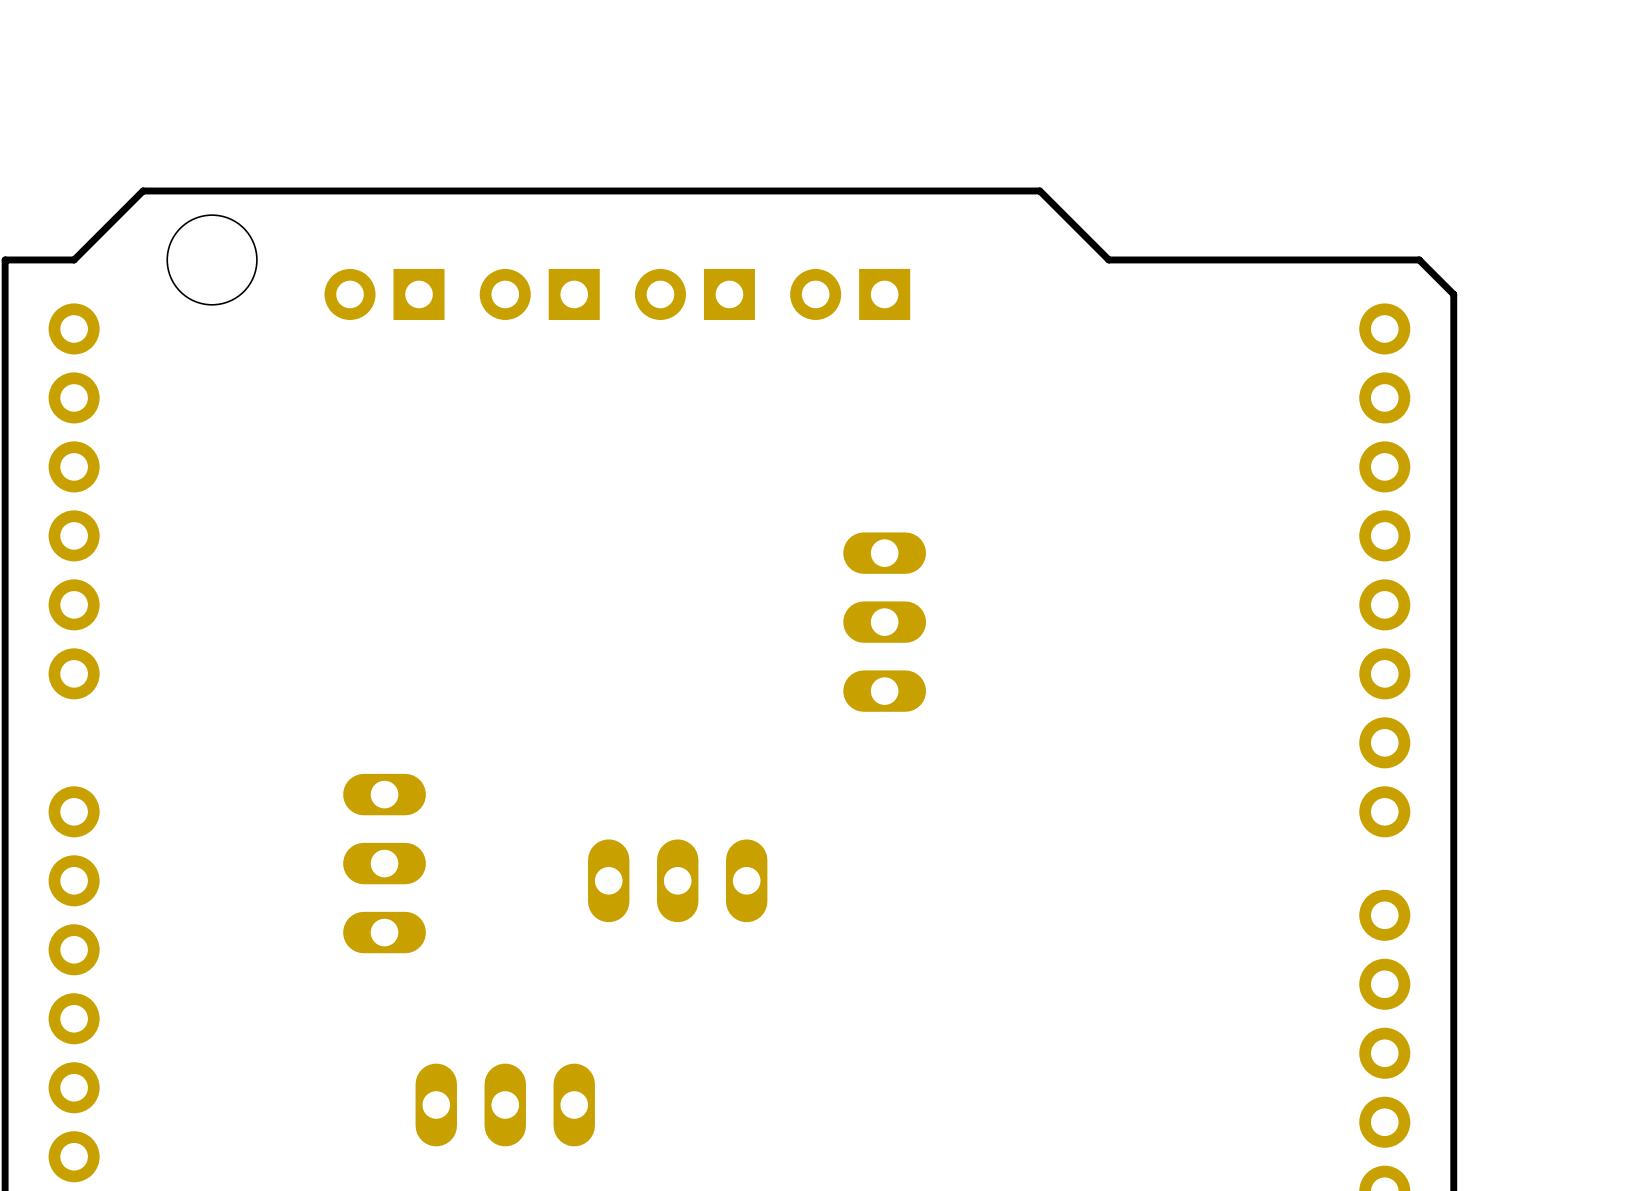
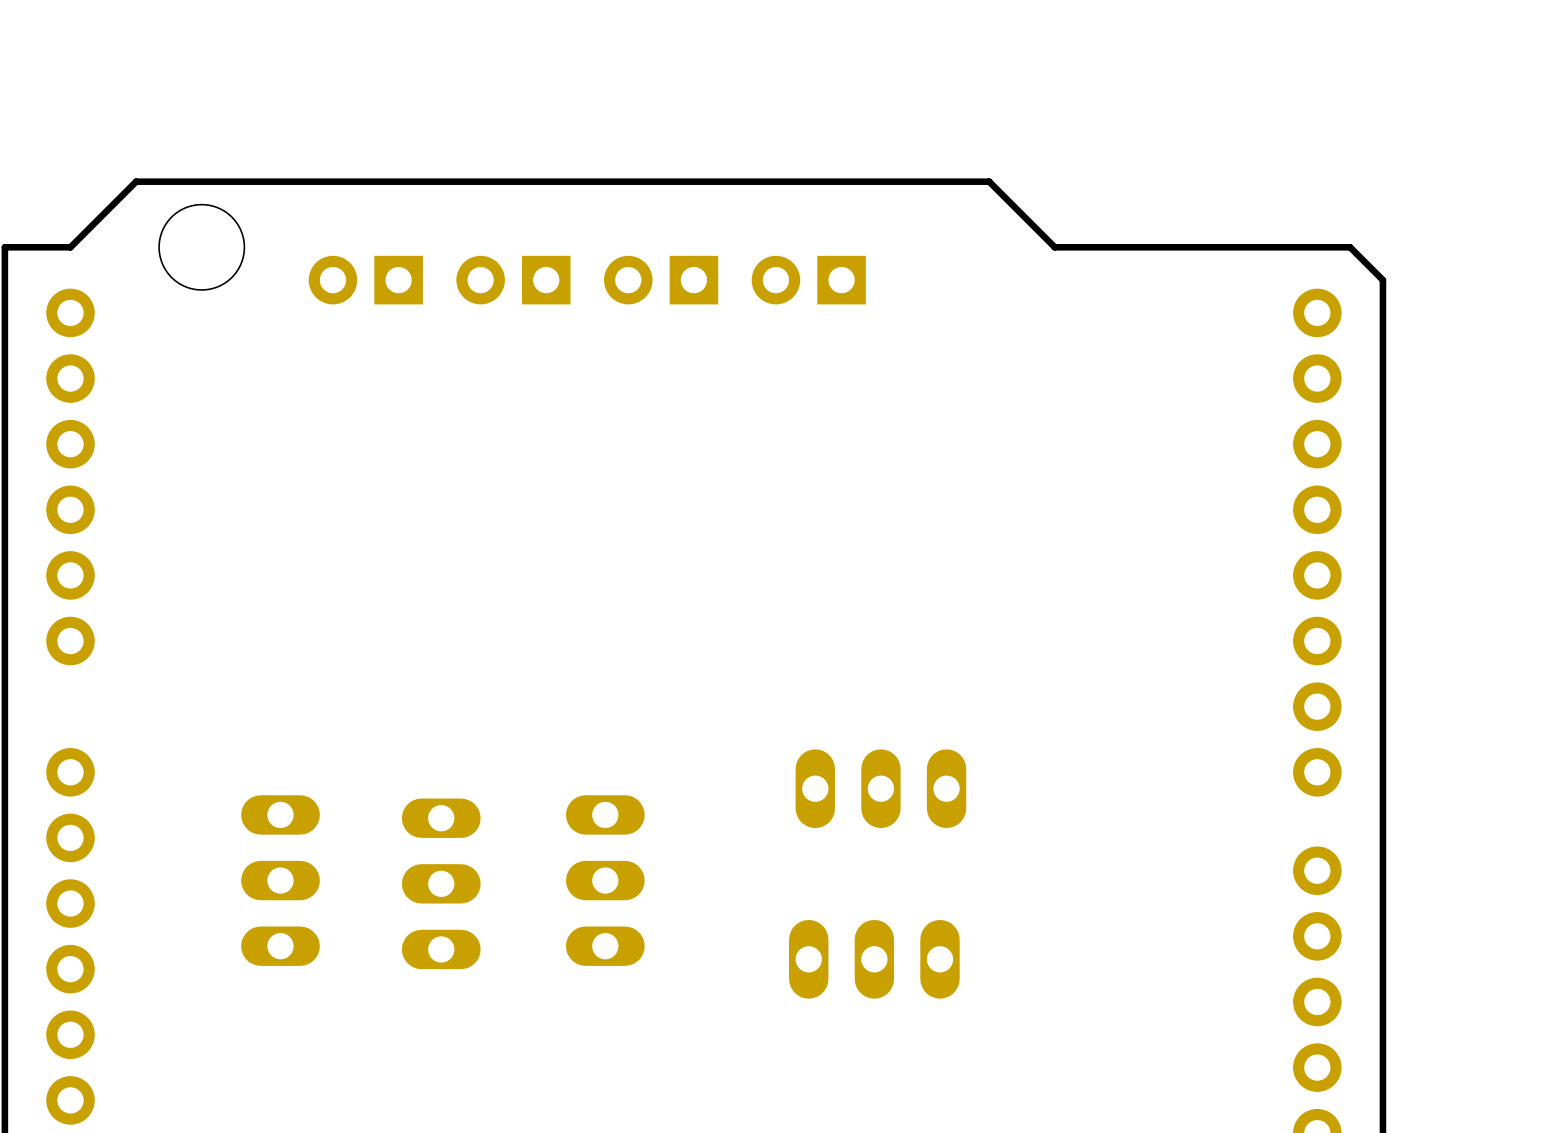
part: (884, 622) -> none
part: none -> (880, 788)
part: (384, 863) -> none
part rotation: 0° (677, 880) -> 90° clockwise (605, 880)
part: none -> (280, 880)
part: none -> (441, 883)
part: none -> (874, 959)
part: (505, 1105) -> none

